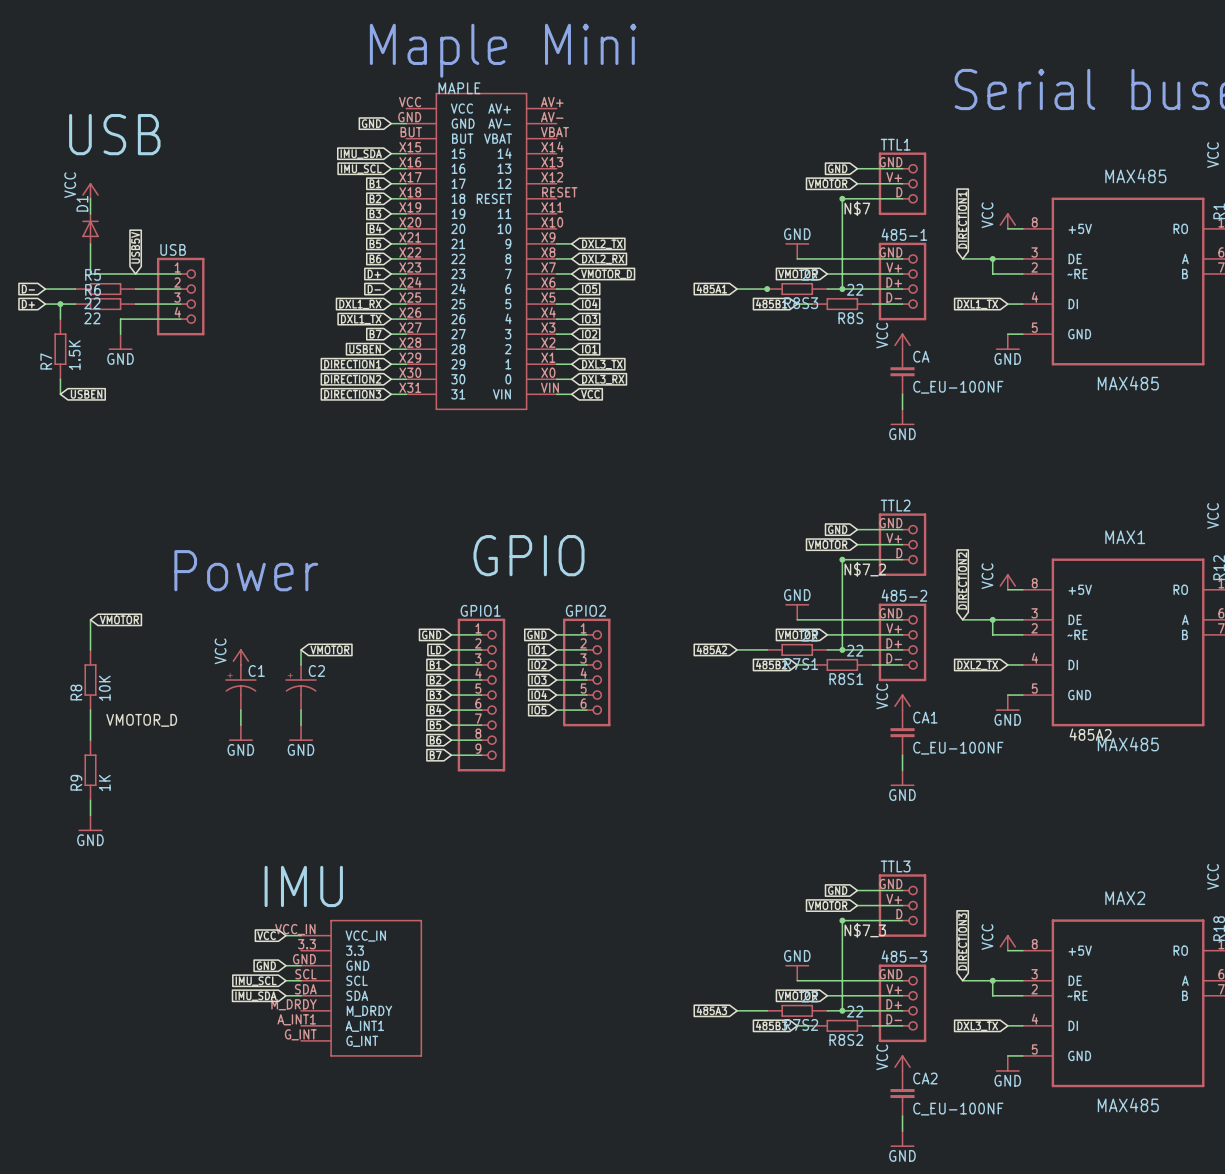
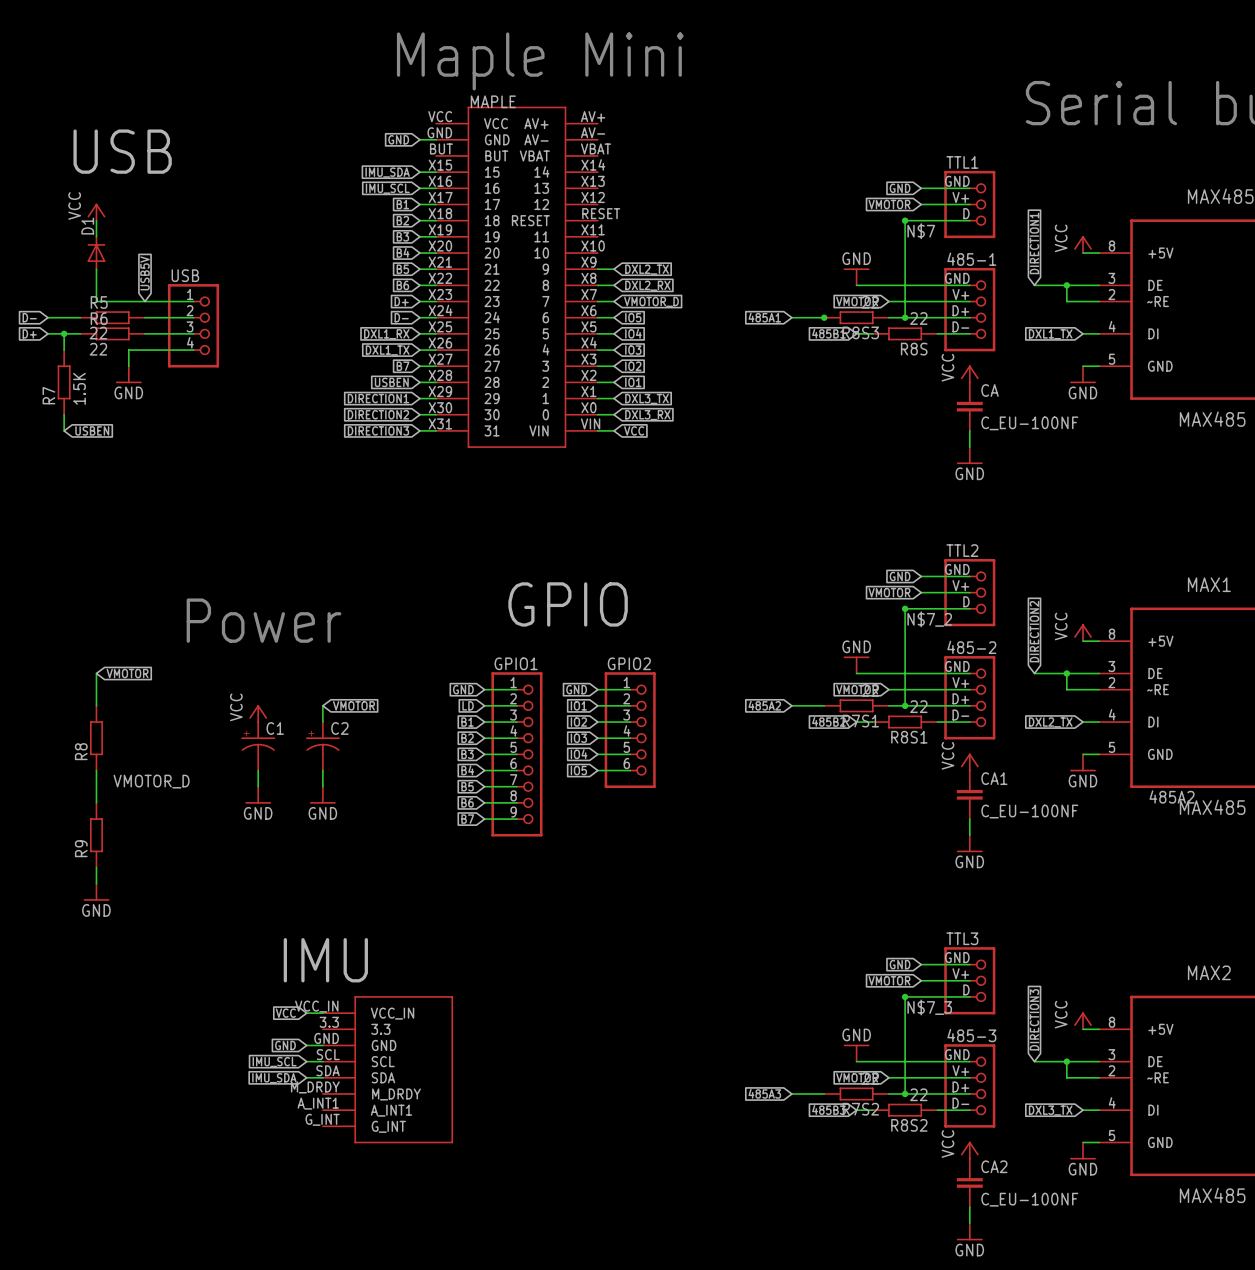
R8 value: 10K (104, 688) -> none
R9 value: 1K (104, 782) -> none

